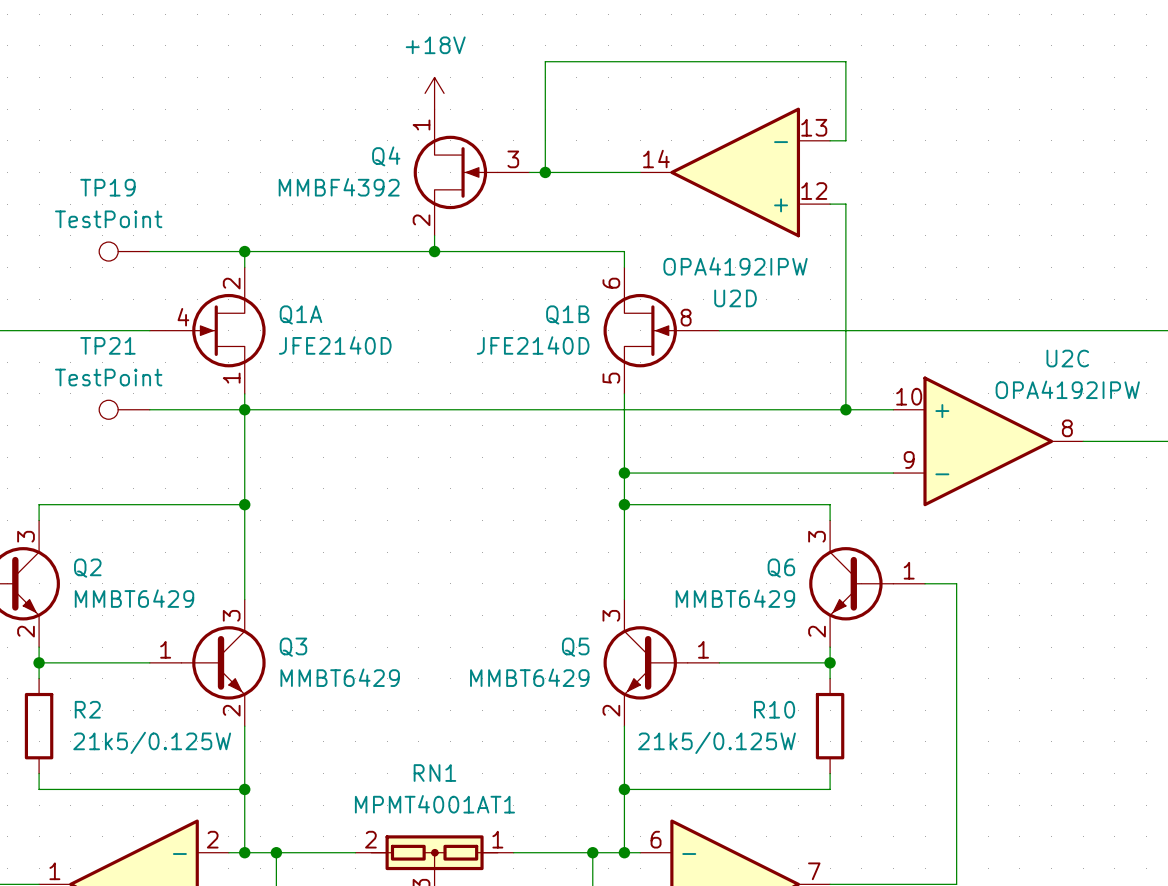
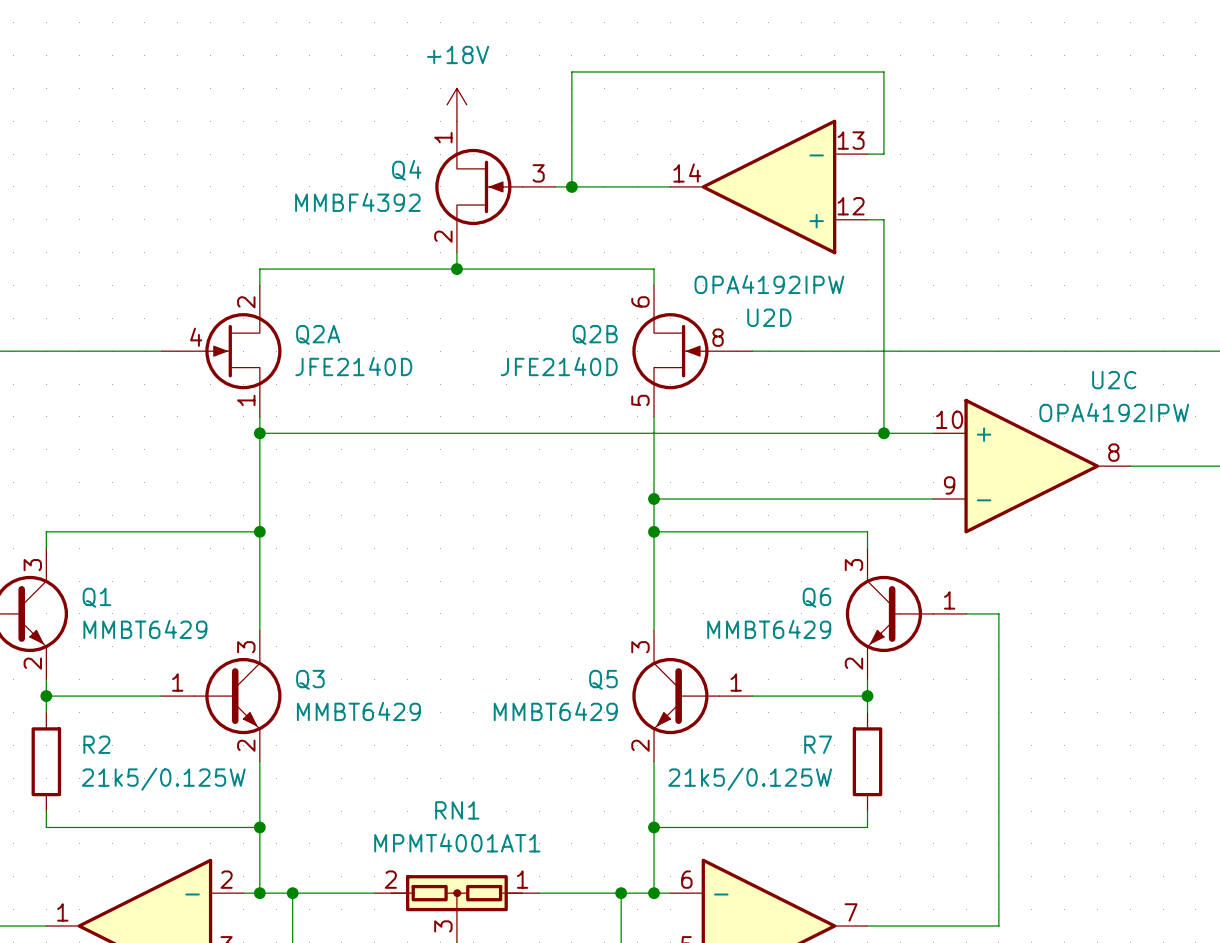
TP19: TestPoint (124, 251) -> none
wire: (149, 251) (244, 251) -> none
junction: (244, 251) -> none
Q1A name: Q1A (300, 314) -> Q2A (318, 334)
Q1B name: Q1B (567, 314) -> Q2B (595, 334)
TP21: TestPoint (124, 409) -> none
wire: (149, 409) (244, 409) -> none
Q2 name: Q2 (87, 568) -> Q1 (96, 597)
R10 name: R10 (774, 709) -> R7 (818, 744)

